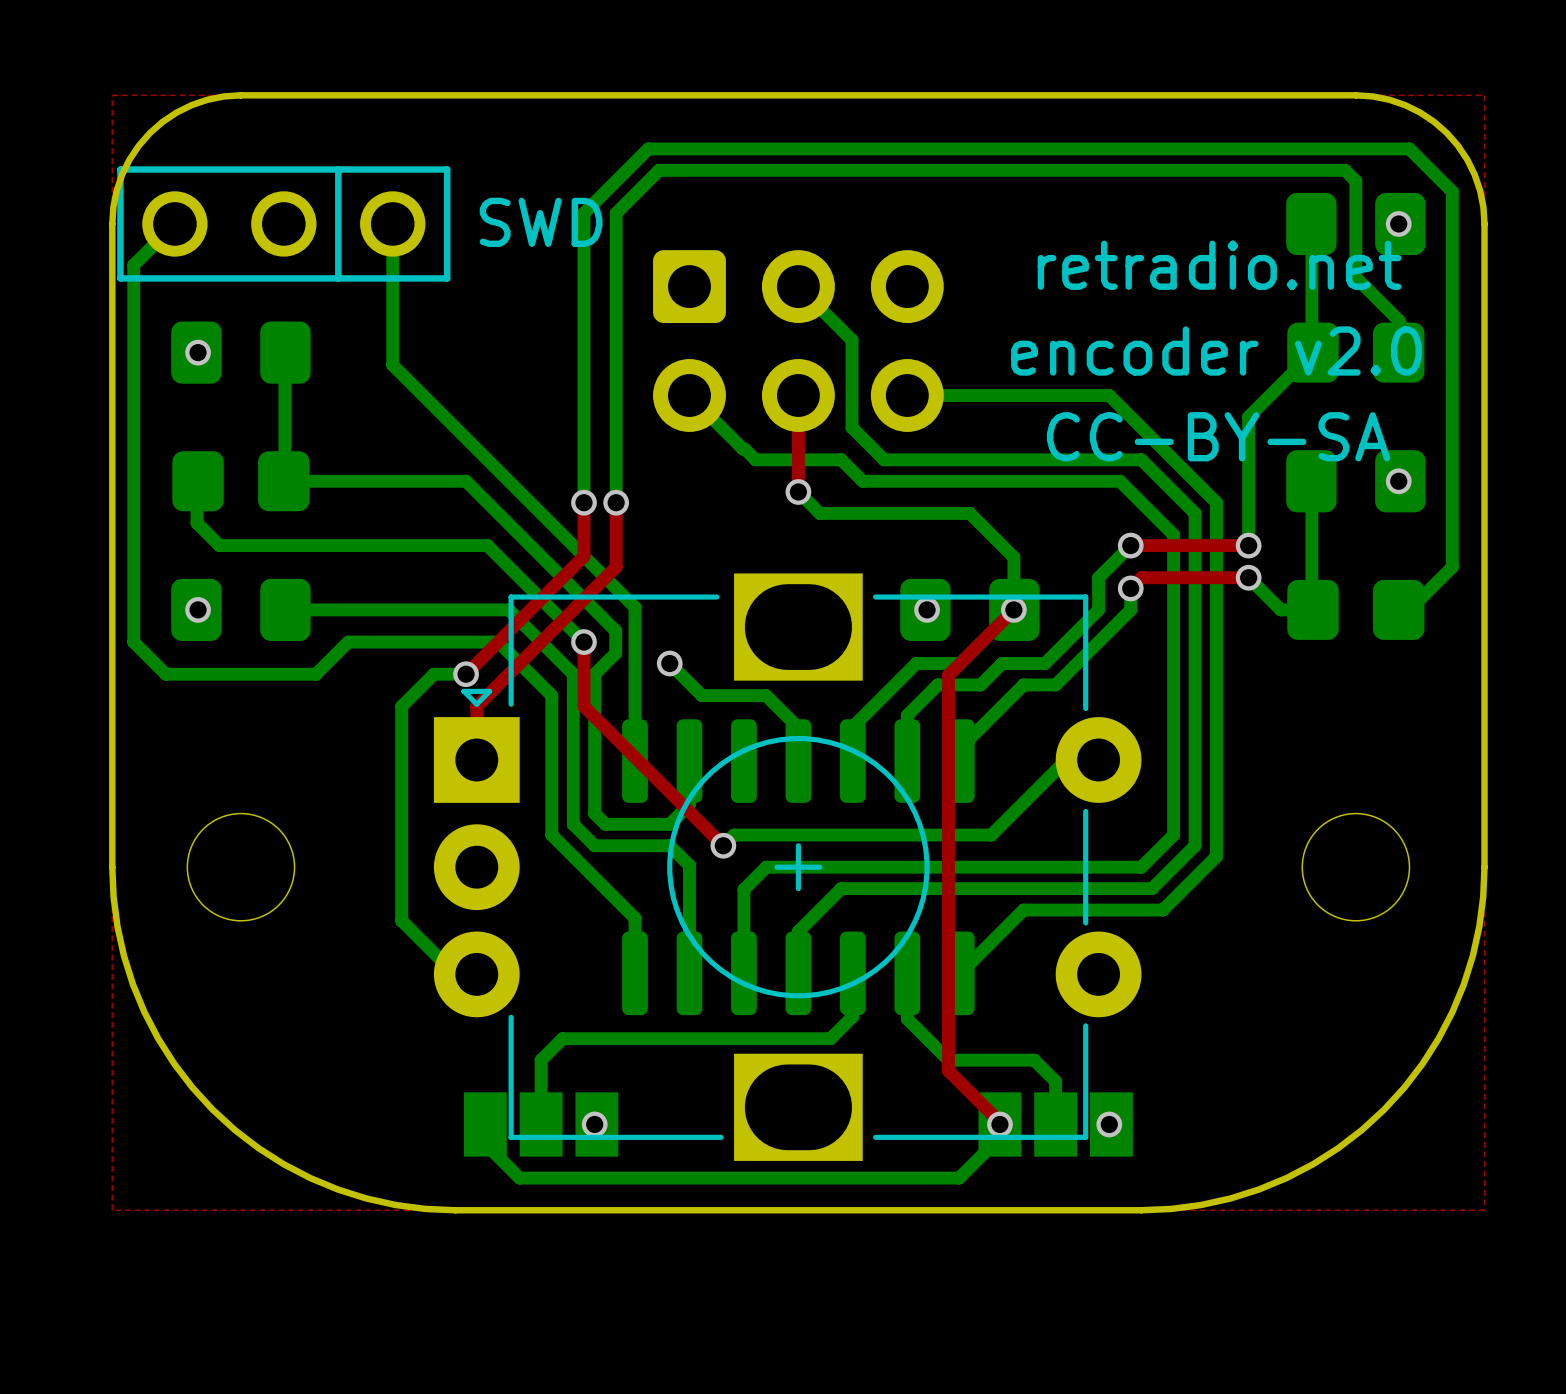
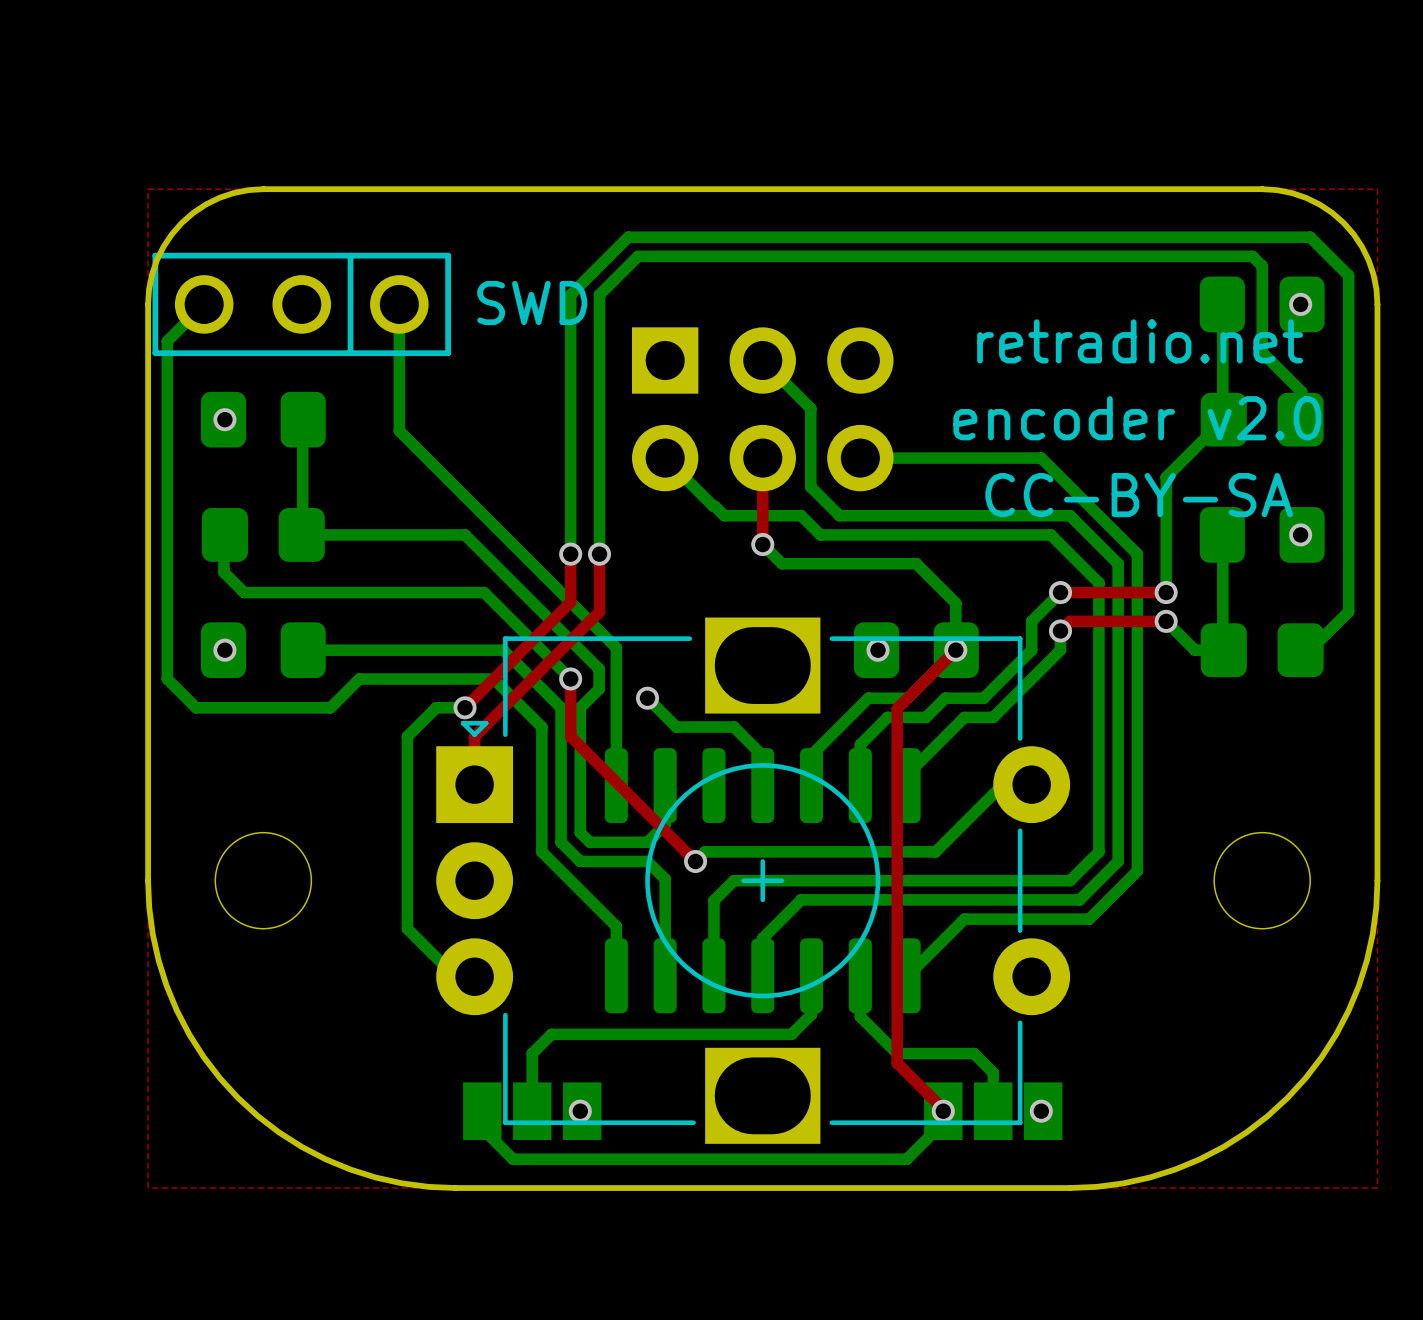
part footprint: [653, 250, 944, 432] -> [632, 327, 894, 492]

